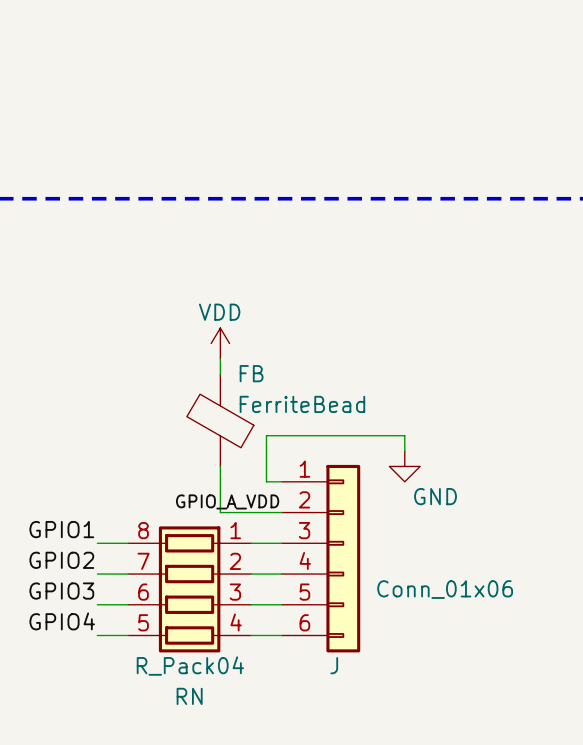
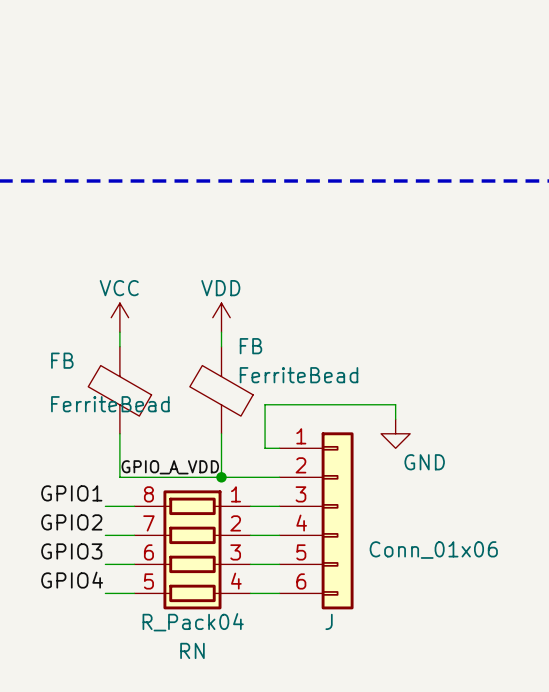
power symbol: none -> VCC (119, 317)
wire: none -> (119, 332) (119, 346)
FB: none -> FerriteBead (119, 390)
wire: none -> (119, 433) (119, 477) (221, 477)
label position: GPIO_A_VDD (227, 501) -> GPIO_A_VDD (170, 467)
junction: none -> (221, 477)

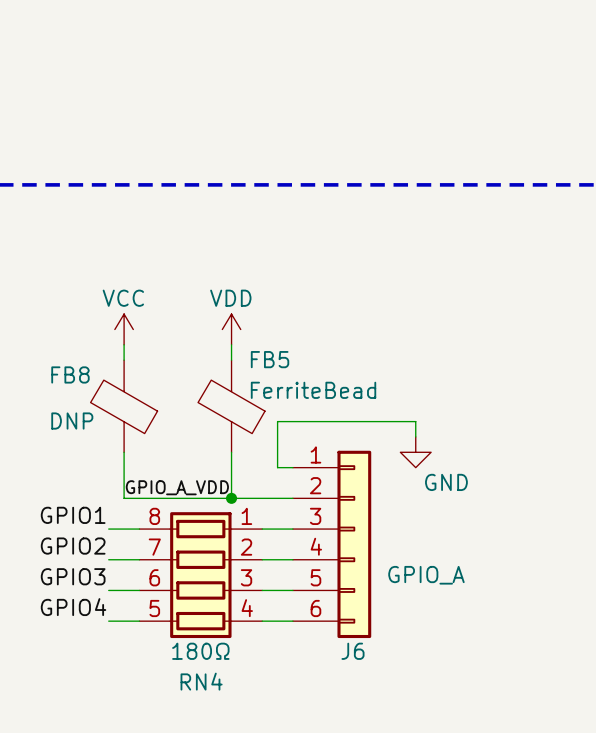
FB name: FB (250, 346) -> FB5 (270, 359)
FB name: FB (62, 360) -> FB8 (70, 374)
FB value: FerriteBead (110, 404) -> DNP (72, 421)
J value: Conn_01x06 (433, 550) -> GPIO_A (426, 575)
J name: J (329, 621) -> J6 (352, 651)
RN value: R_Pack04 (193, 622) -> 180Ω (200, 651)
RN name: RN (192, 650) -> RN4 (201, 681)

